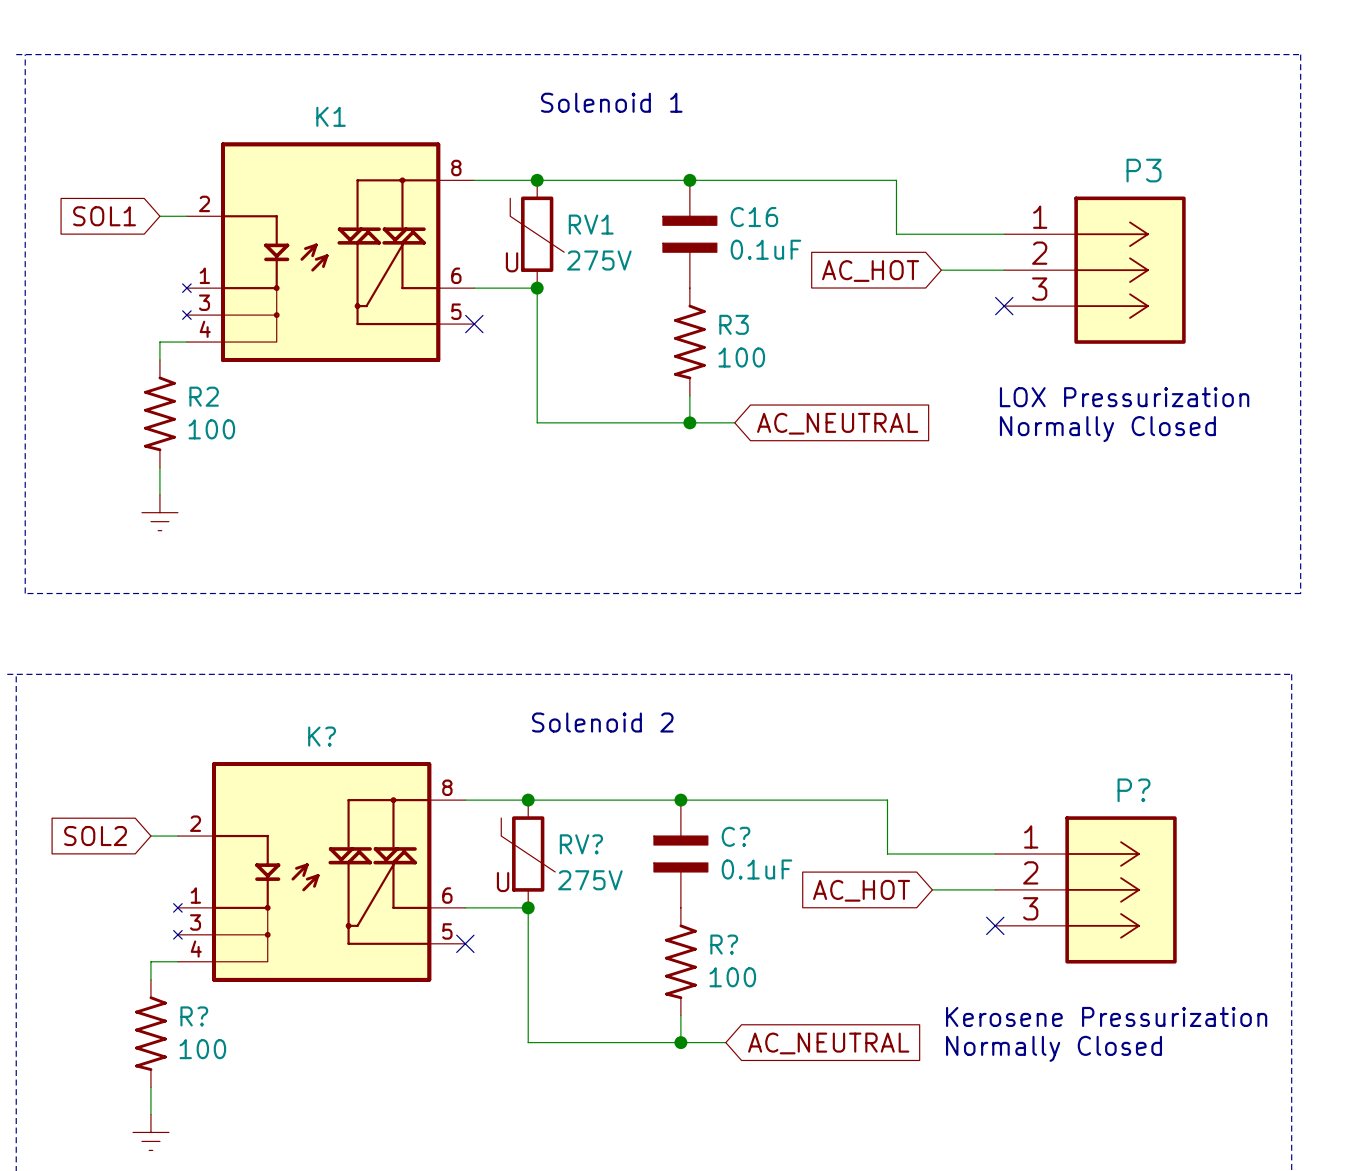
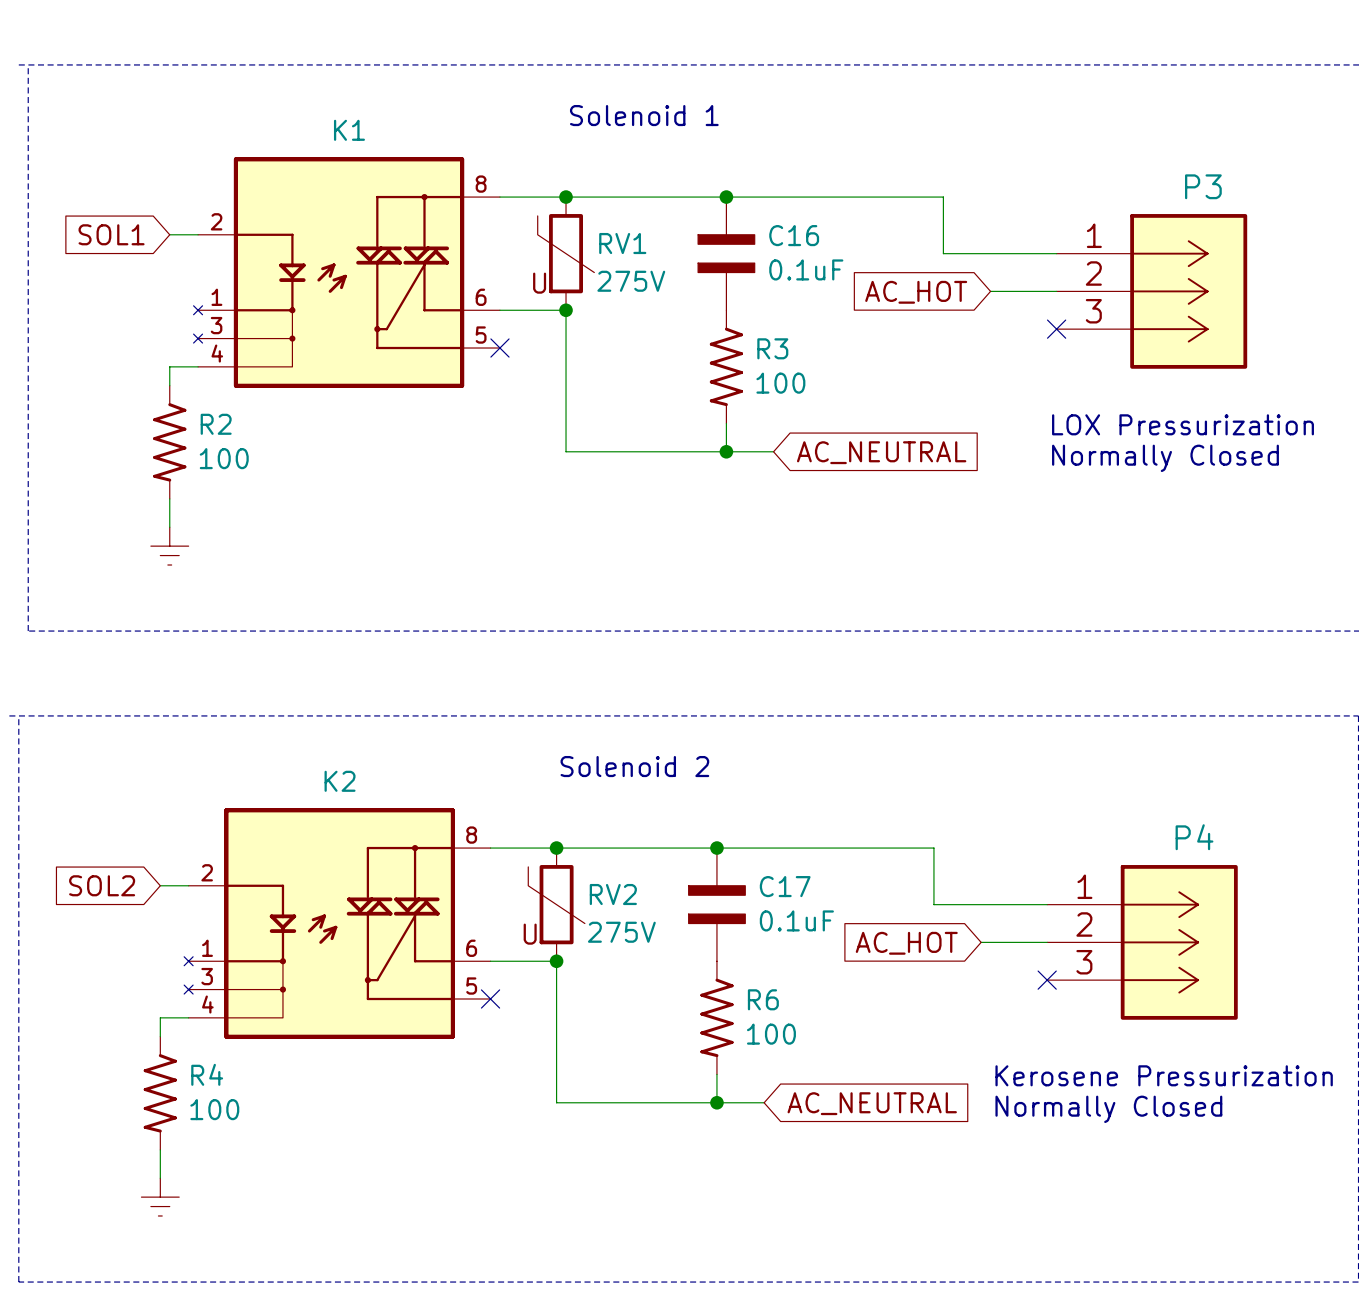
K? name: K? (322, 736) -> K2 (340, 781)
P? name: P? (1133, 790) -> P4 (1194, 837)
C? name: C? (736, 836) -> C17 (785, 886)
RV? name: RV? (581, 844) -> RV2 (613, 894)
R? name: R? (724, 944) -> R6 (763, 999)
R? name: R? (194, 1016) -> R4 (207, 1074)

